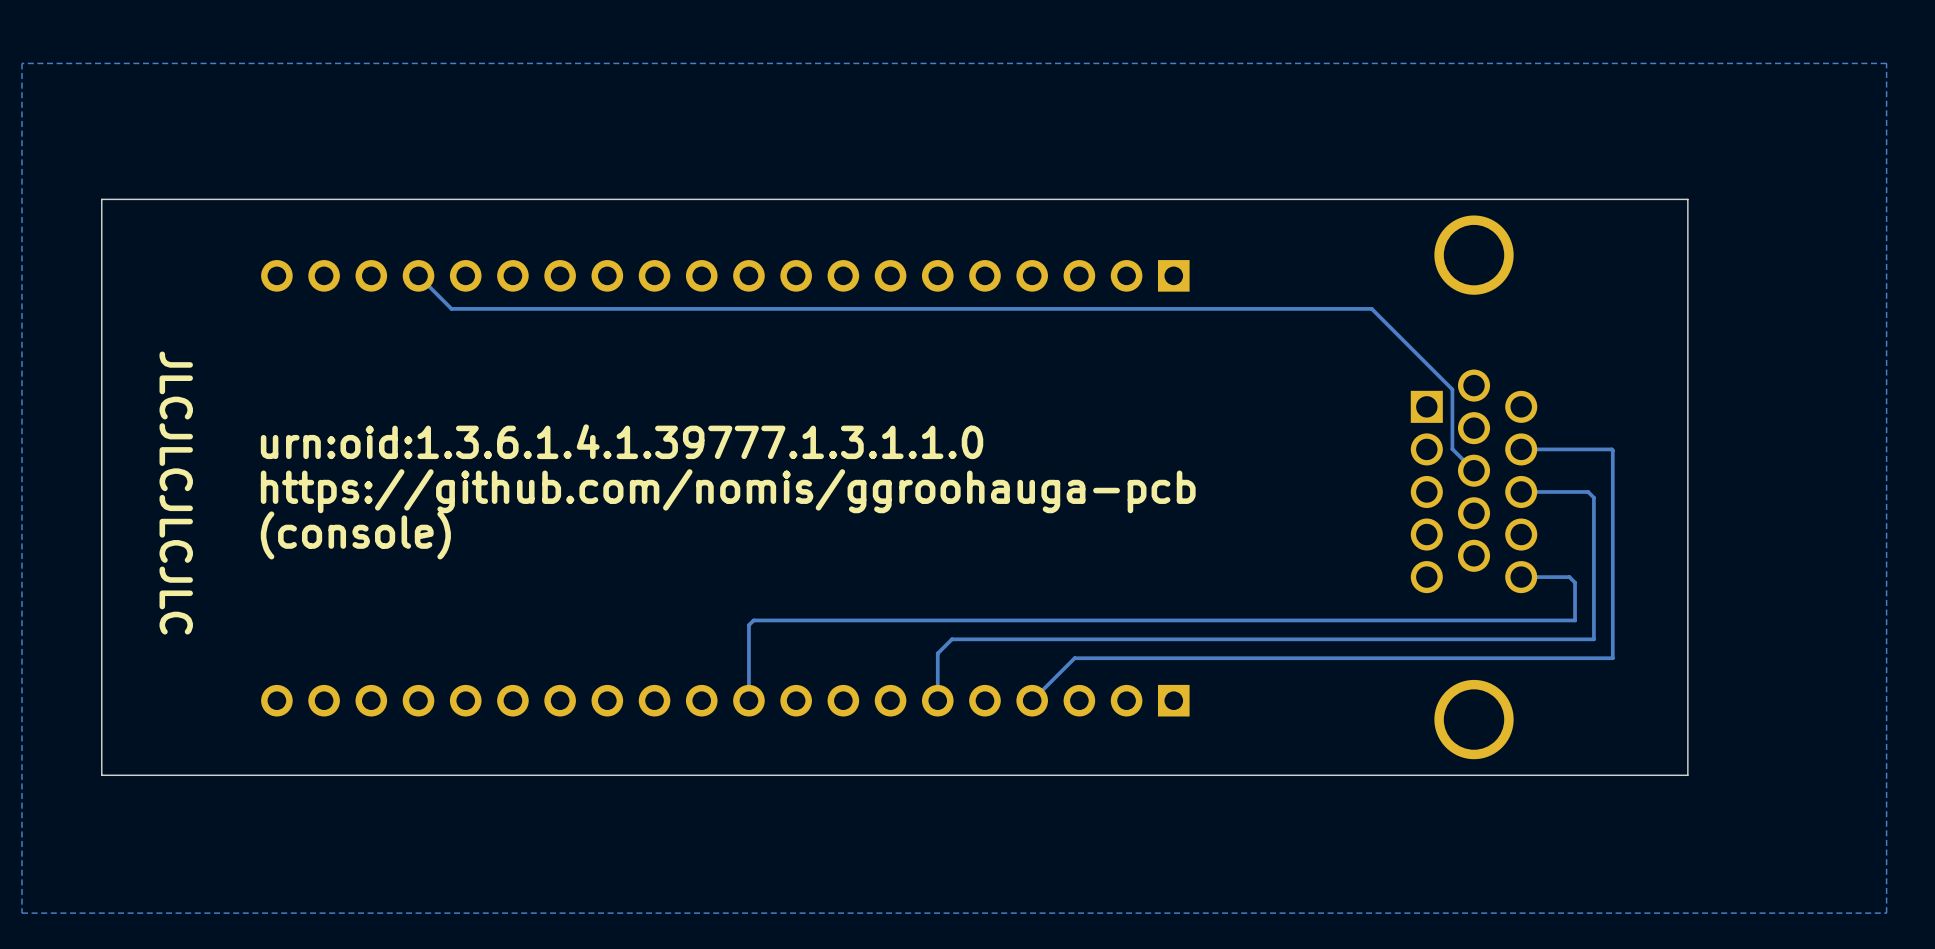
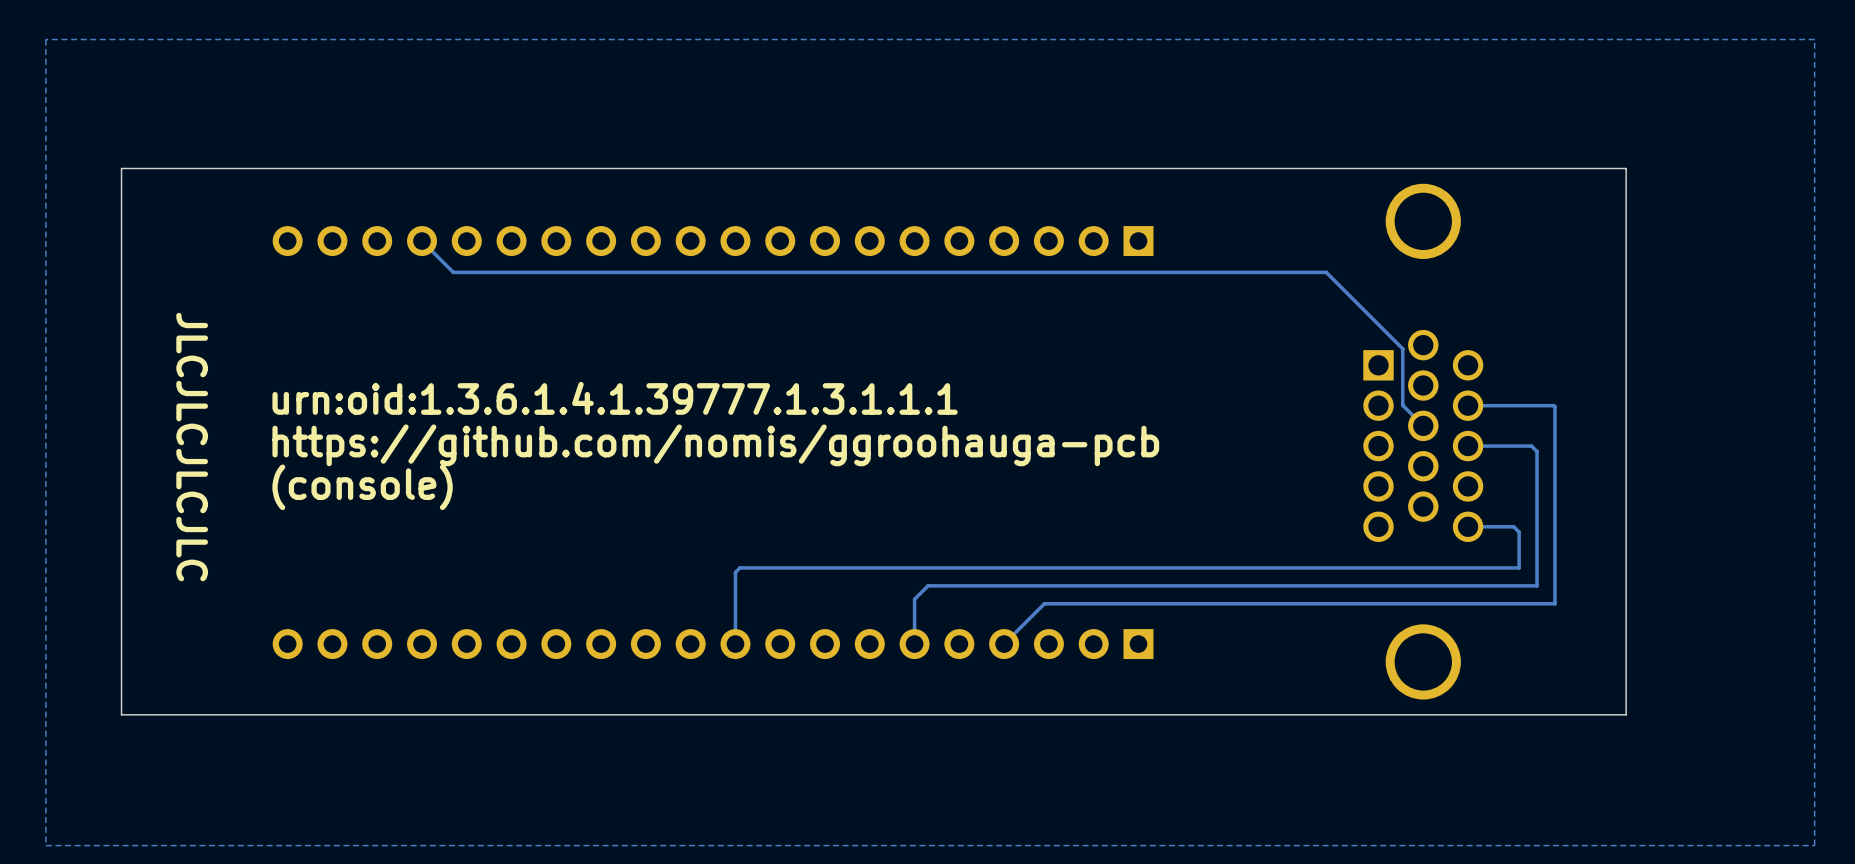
text: urn:oid:1.3.6.1.4.1.39777.1.3.1.1.0 (622, 441) -> urn:oid:1.3.6.1.4.1.39777.1.3.1.1.1 (615, 398)

